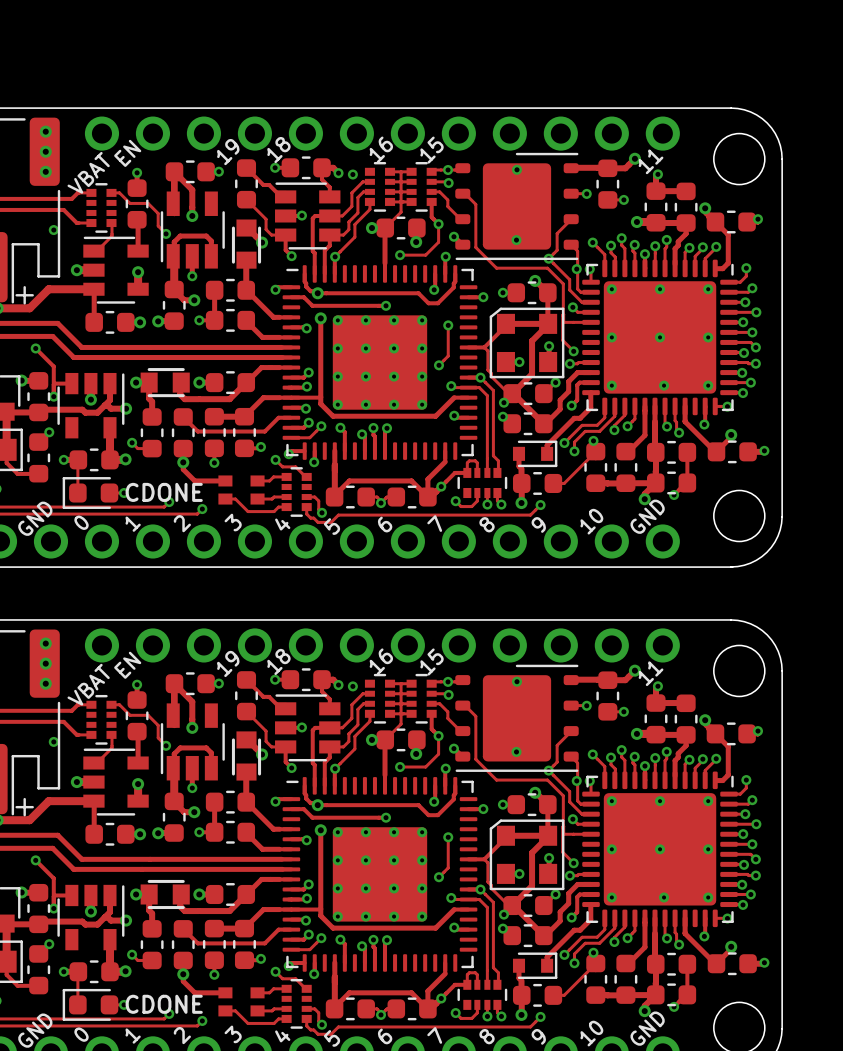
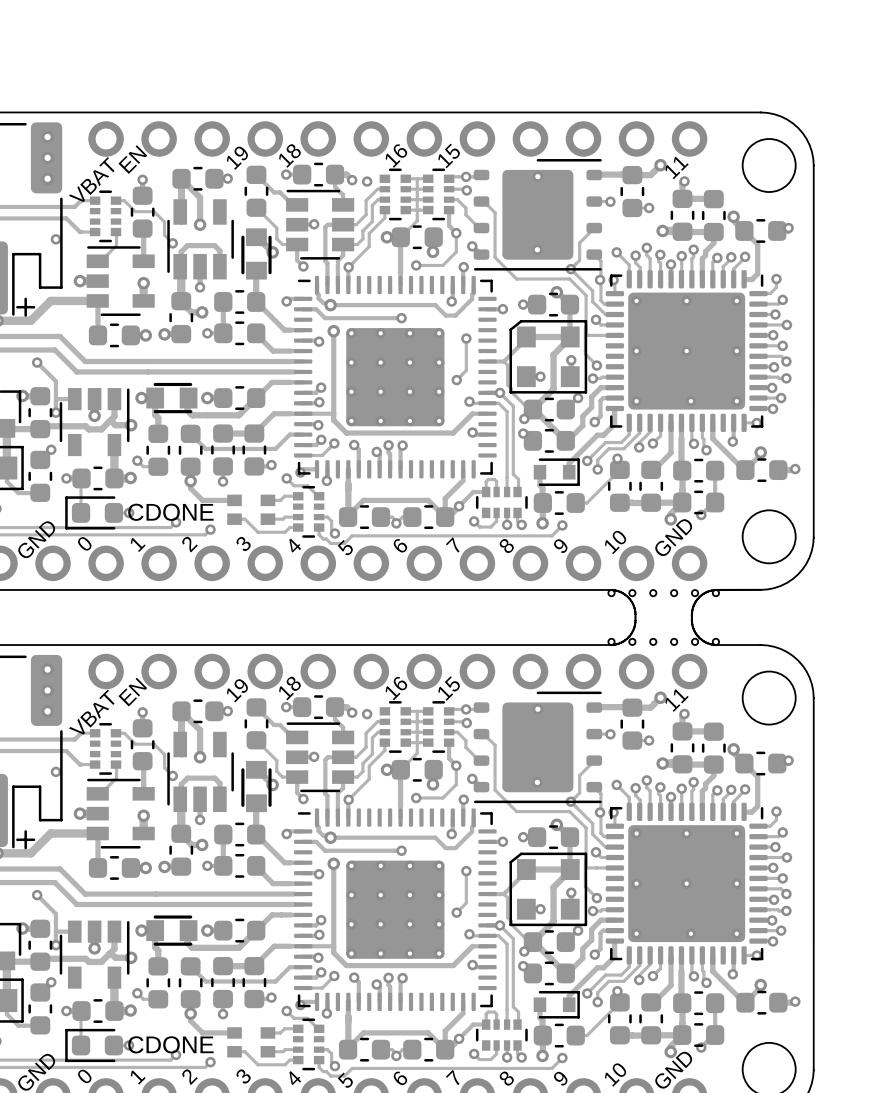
board edge: none -> (760, 589) (713, 590) (705, 592) (697, 598) (692, 612) (693, 628) (702, 640) (715, 645)
board edge: (587, 567) (732, 567) -> none
part: none -> (663, 593)
part: none -> (663, 641)
board edge: (587, 619) (688, 619) -> (611, 645) (621, 642) (628, 637) (633, 628) (635, 620) (634, 608) (629, 598) (621, 592) (611, 589)

